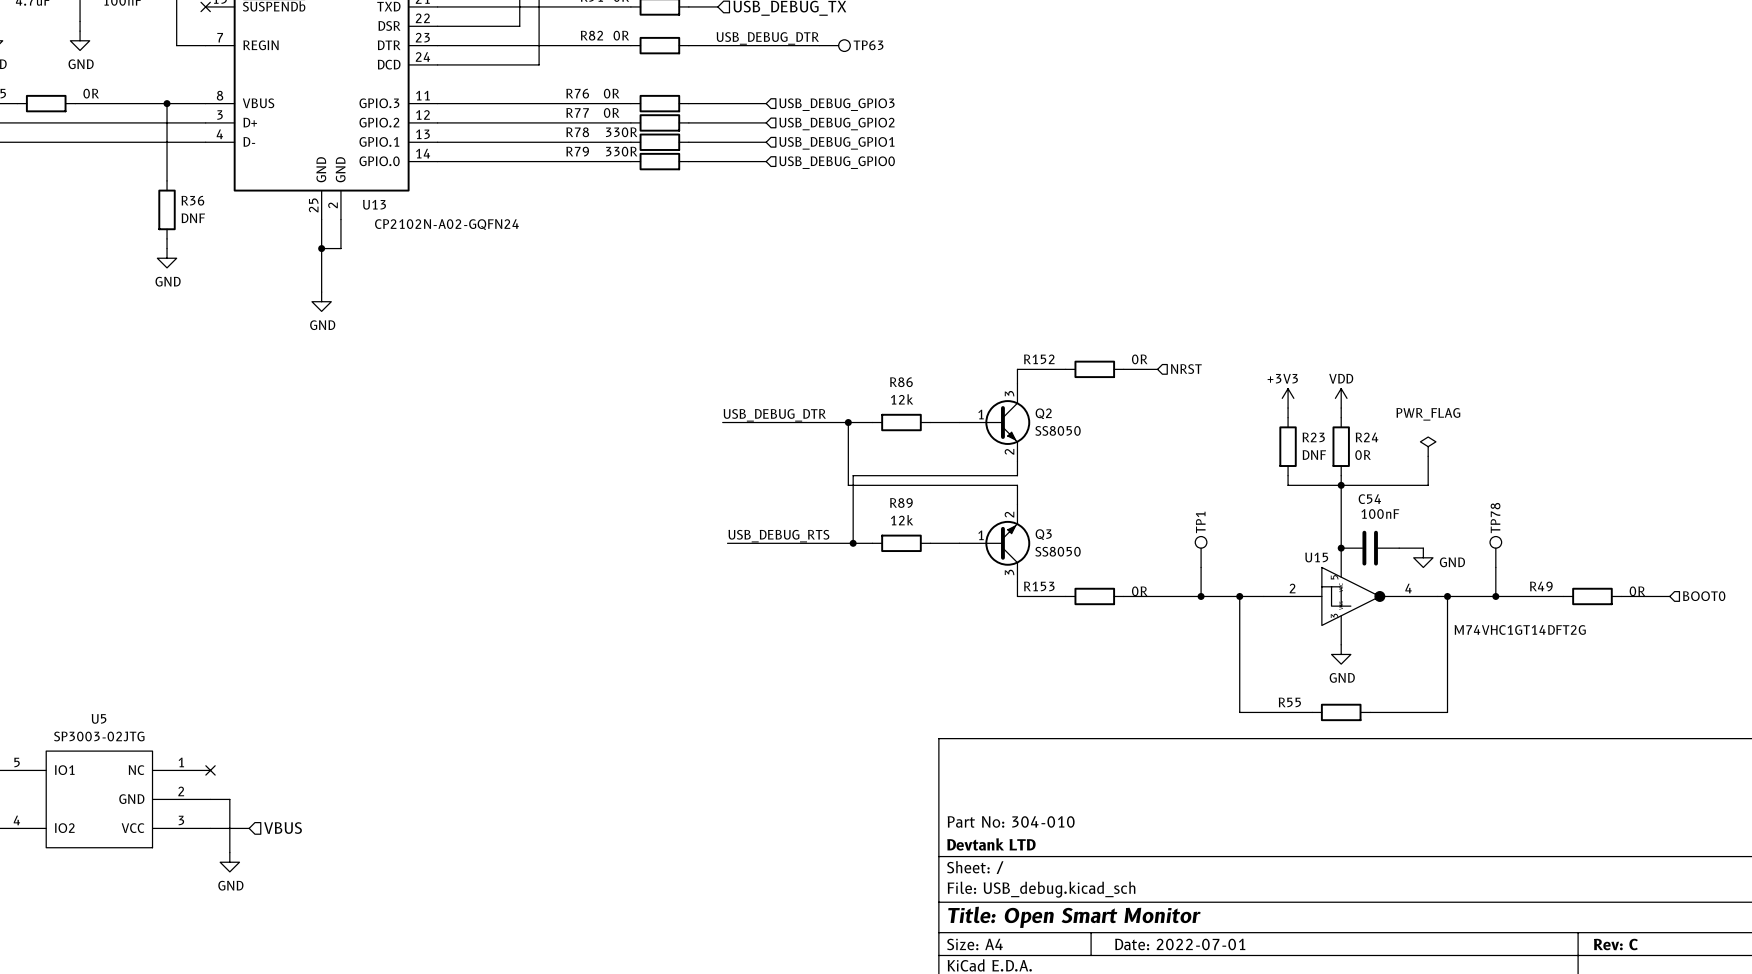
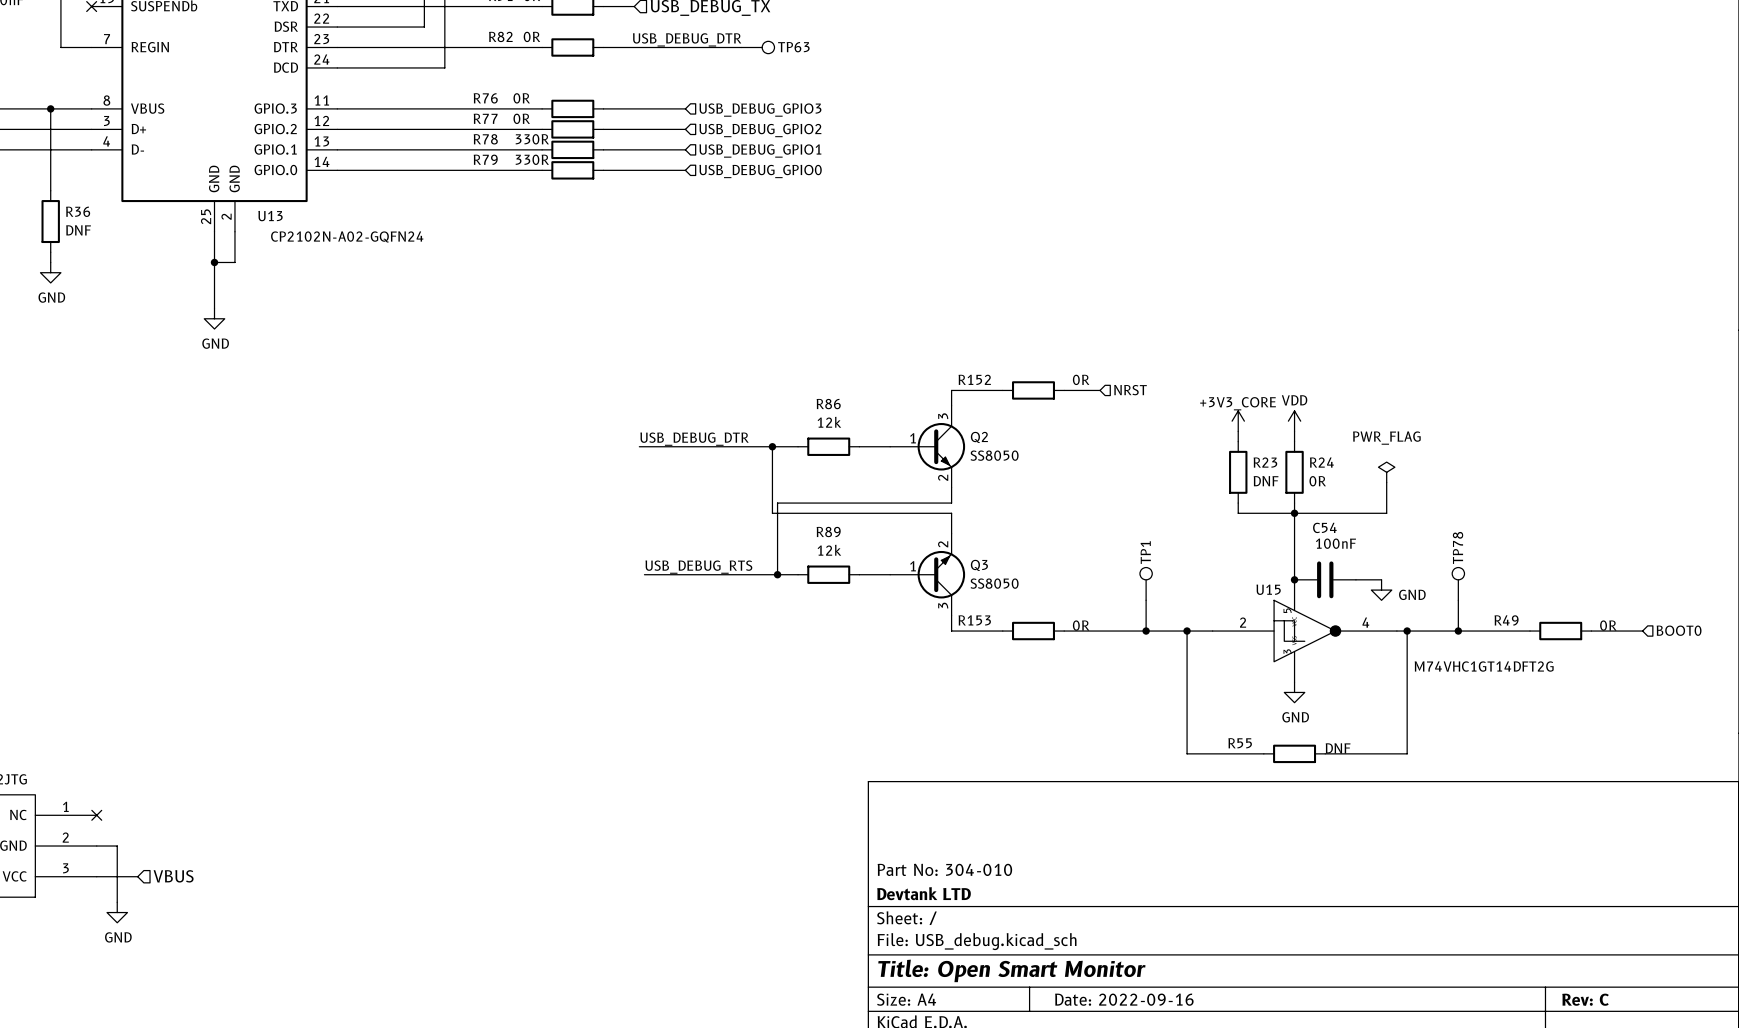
power symbol: +3V3 (1288, 398) -> +3V3_CORE (1238, 421)
R55 value: none -> DNF (1338, 748)
title block: Date: 2022-07-01 (1180, 944) -> Date: 2022-09-16 (1124, 999)

